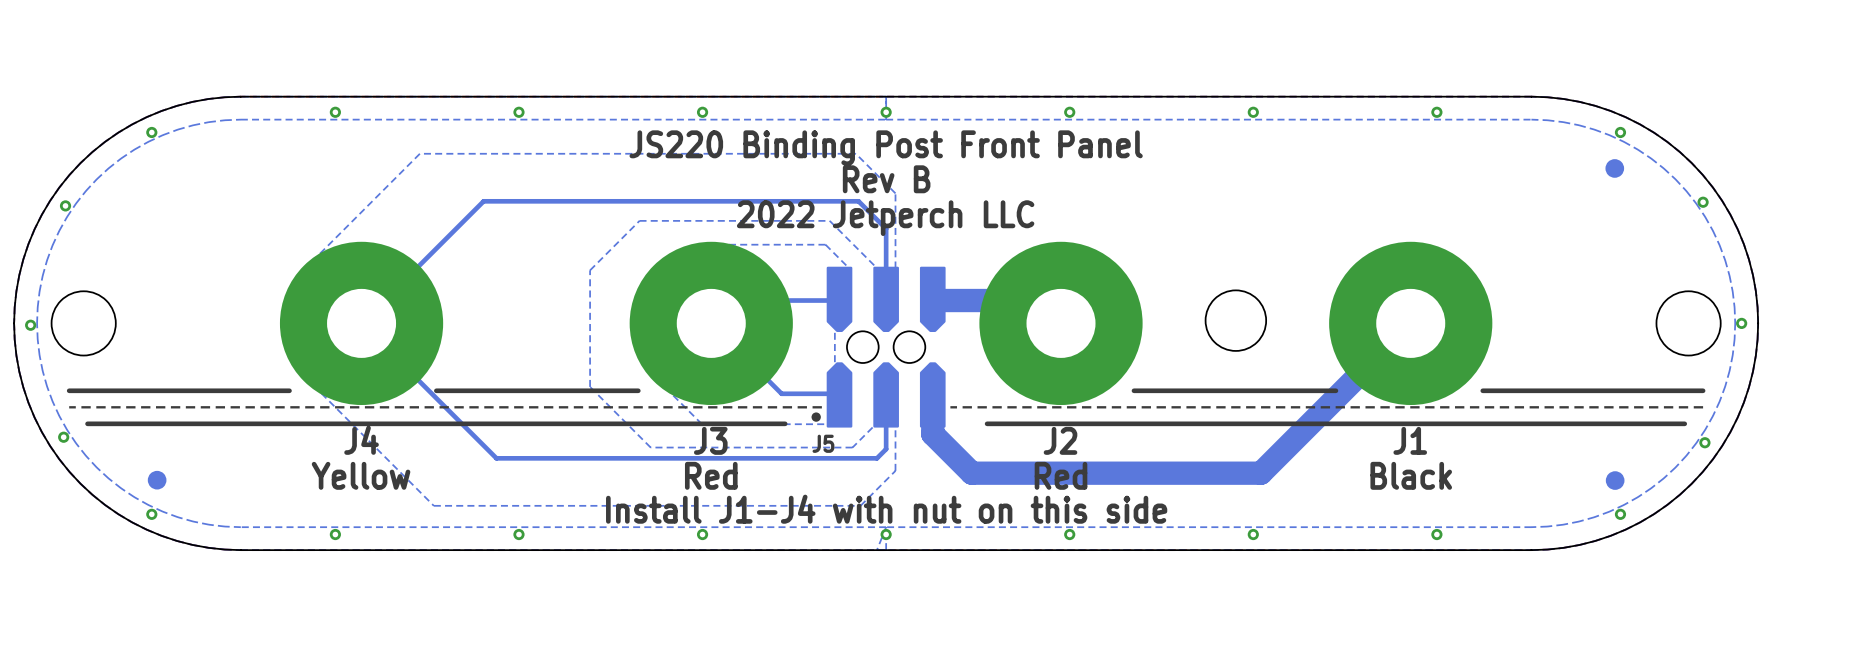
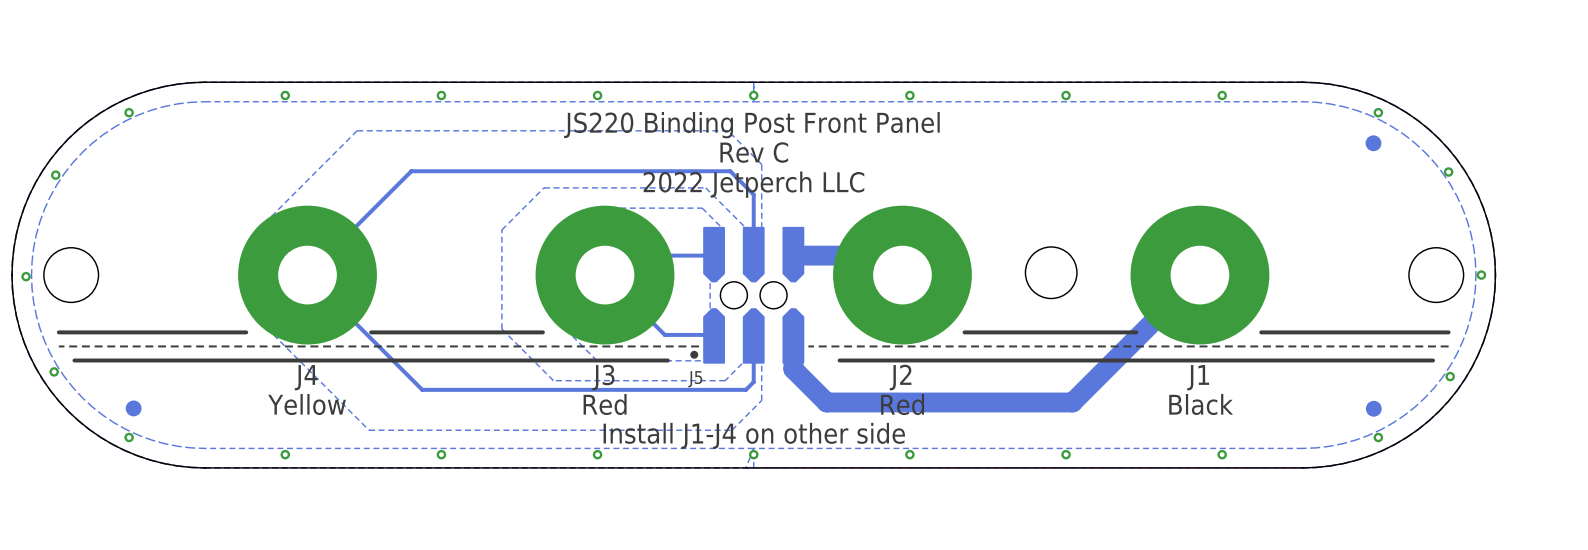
text: Rev B (886, 179) -> Rev C (754, 152)
text: Install J1-J4 with nut on this side (886, 509) -> Install J1-J4 on other side (754, 435)

